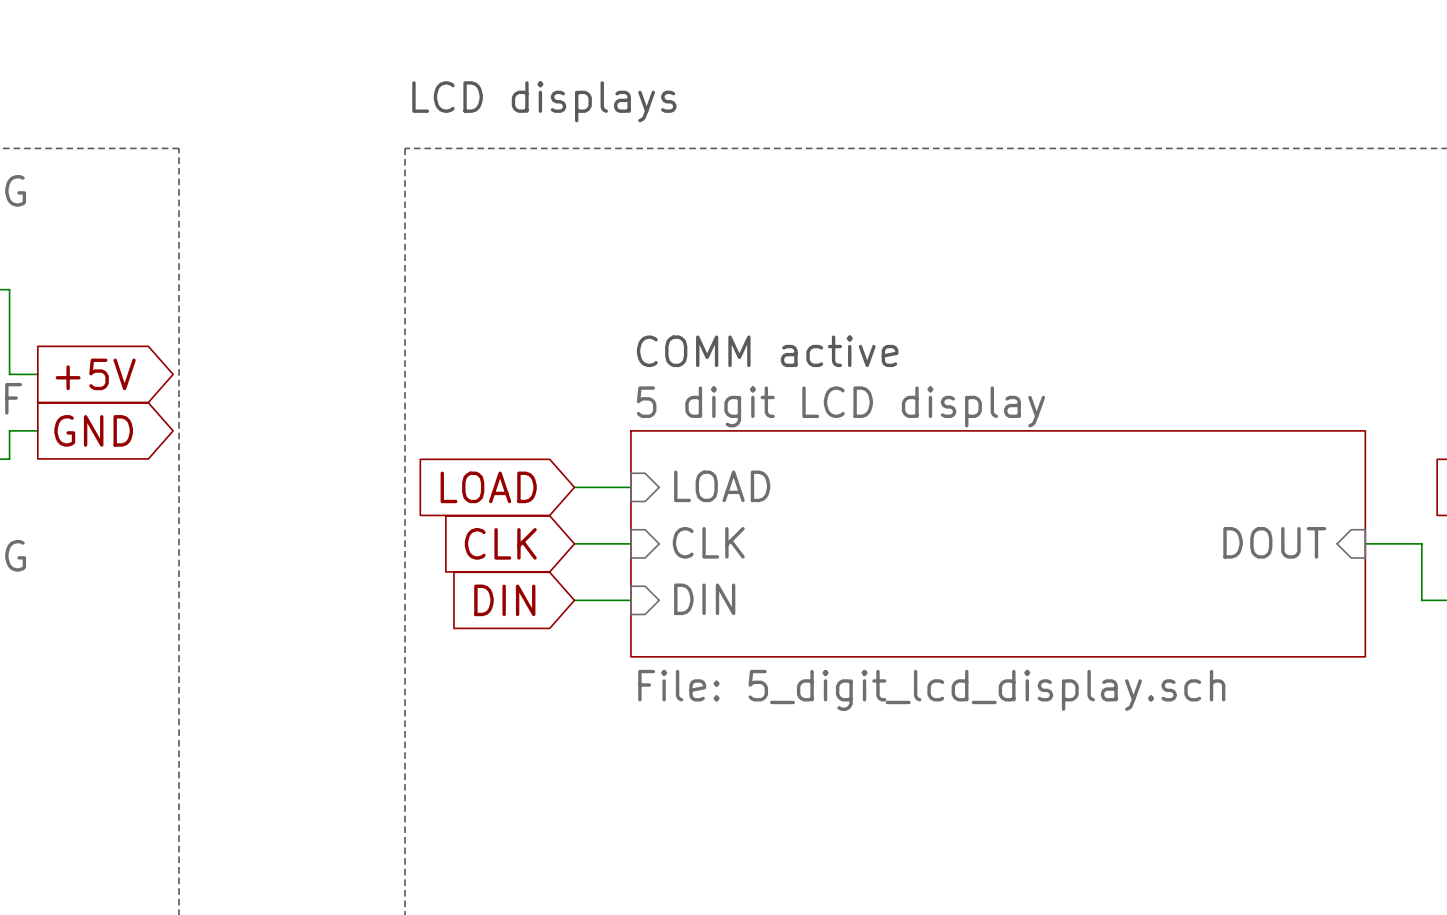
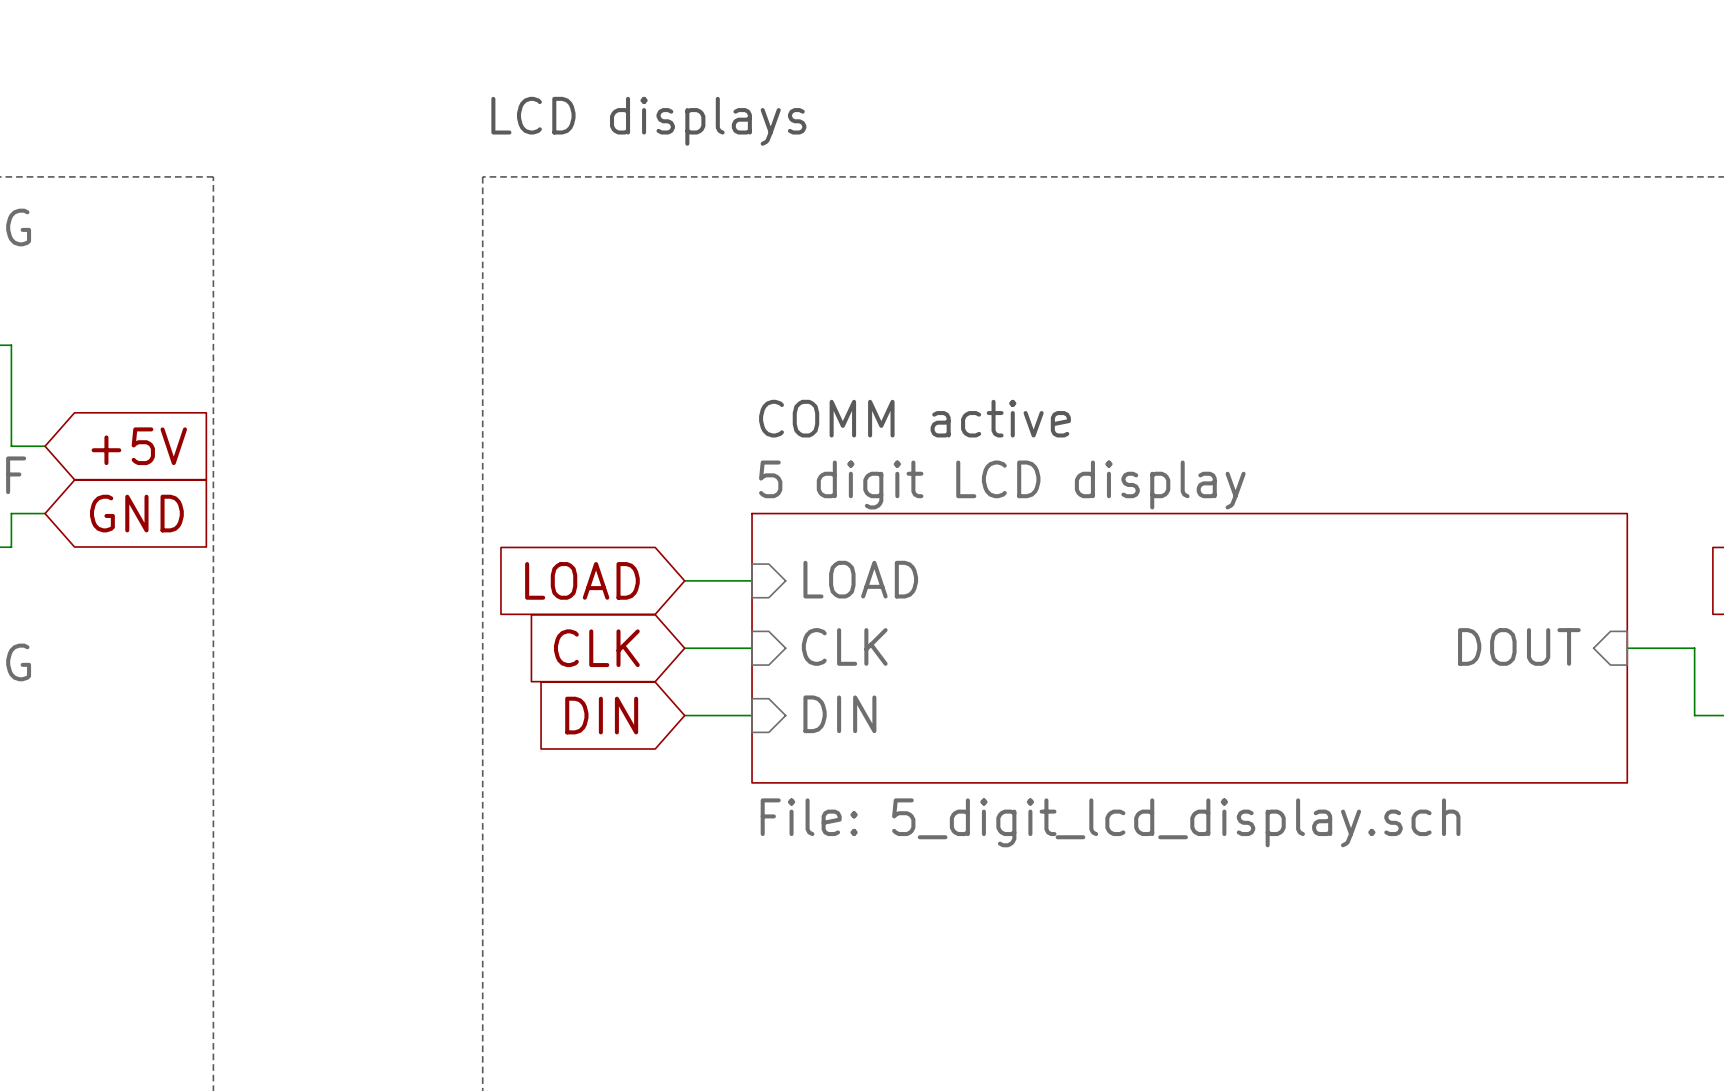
global label shape: output (95, 374) -> input (139, 446)
global label shape: output (93, 430) -> input (136, 513)

